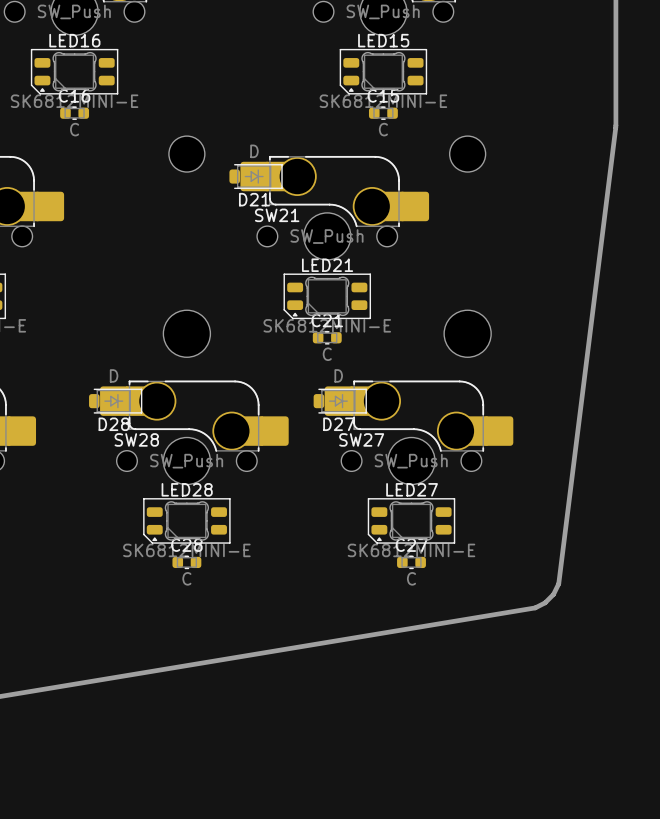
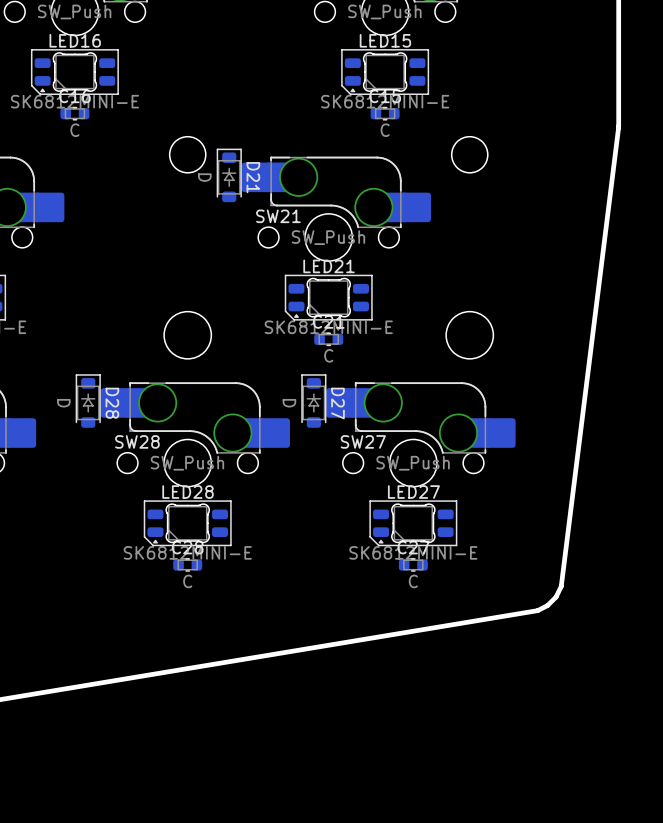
D21 rotation: 0° (256, 176) -> 90° counterclockwise (229, 175)
D28 rotation: 0° (115, 401) -> 90° counterclockwise (88, 401)
D27 rotation: 0° (340, 401) -> 90° counterclockwise (313, 401)

